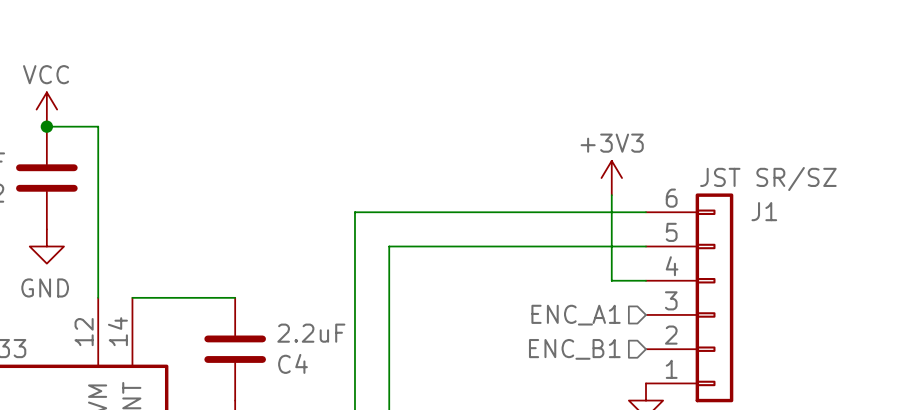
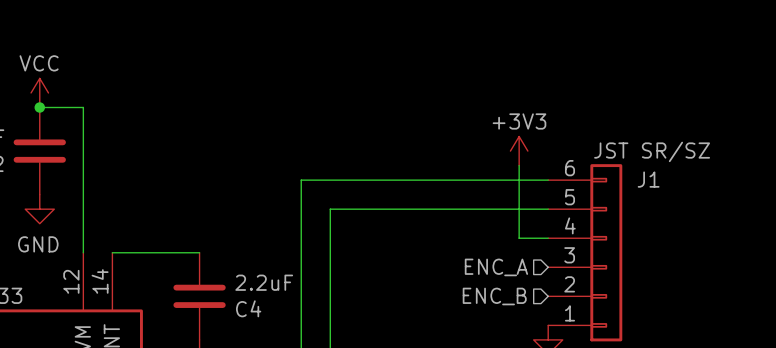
hierarchical label: ENC_A1 (576, 315) -> ENC_A (496, 267)
hierarchical label: ENC_B1 (574, 349) -> ENC_B (494, 296)

